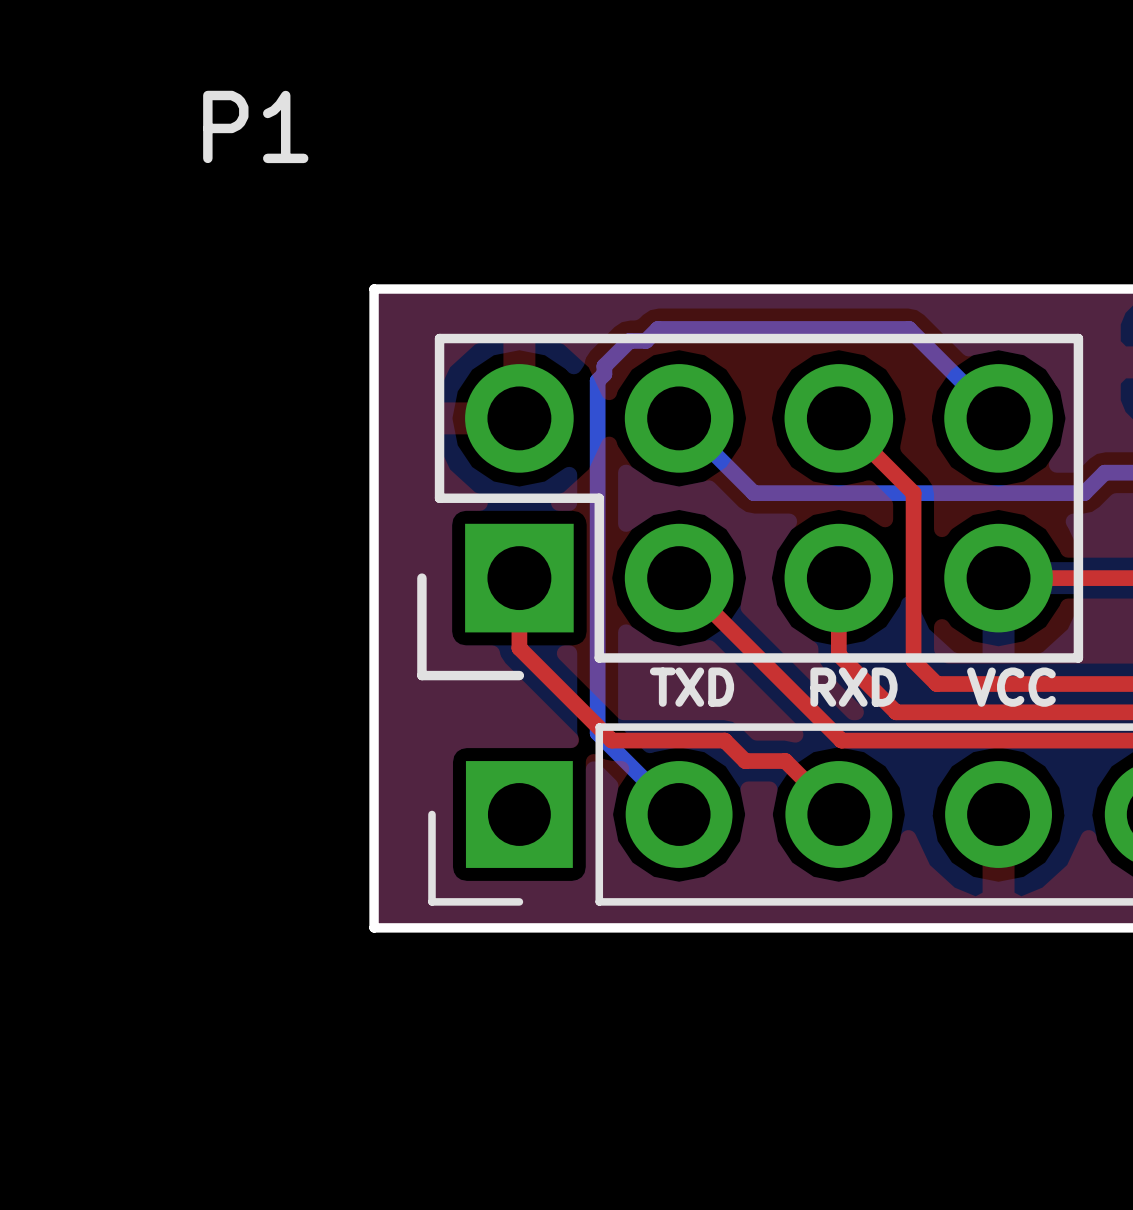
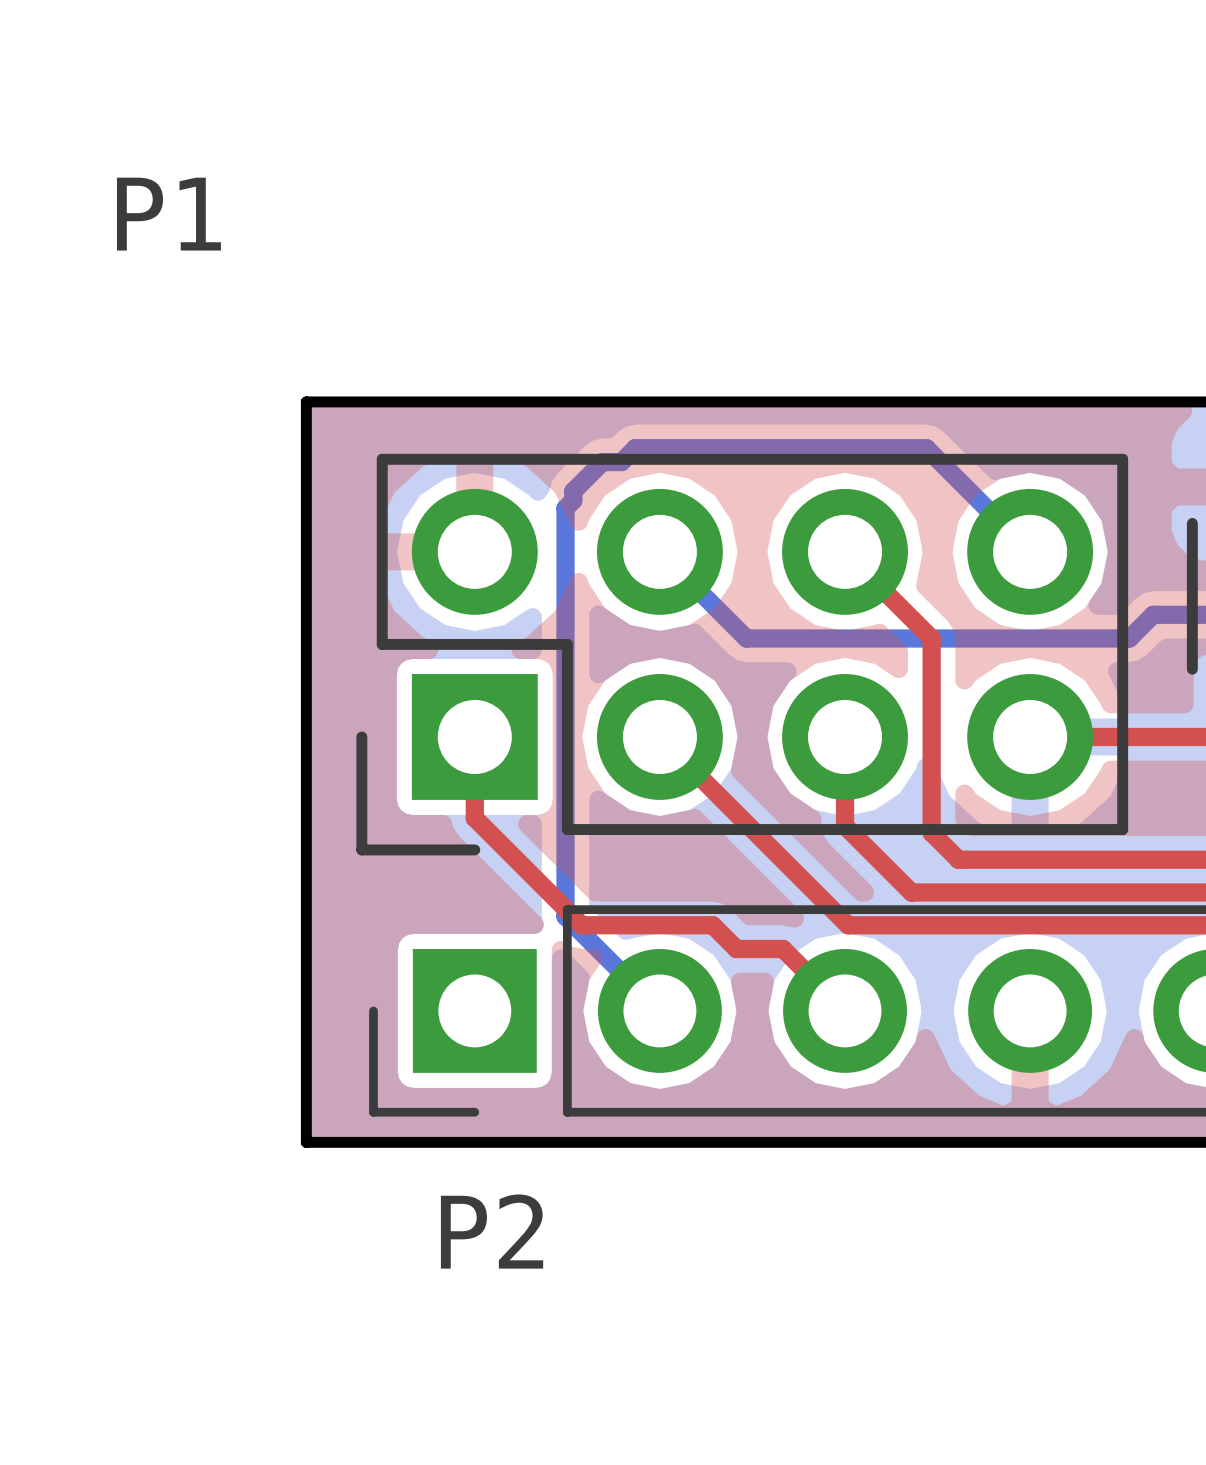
text: TXD (691, 687) -> none
text: RXD (853, 687) -> none
text: VCC (1011, 687) -> none
P2 name: none -> P2 (492, 1231)

